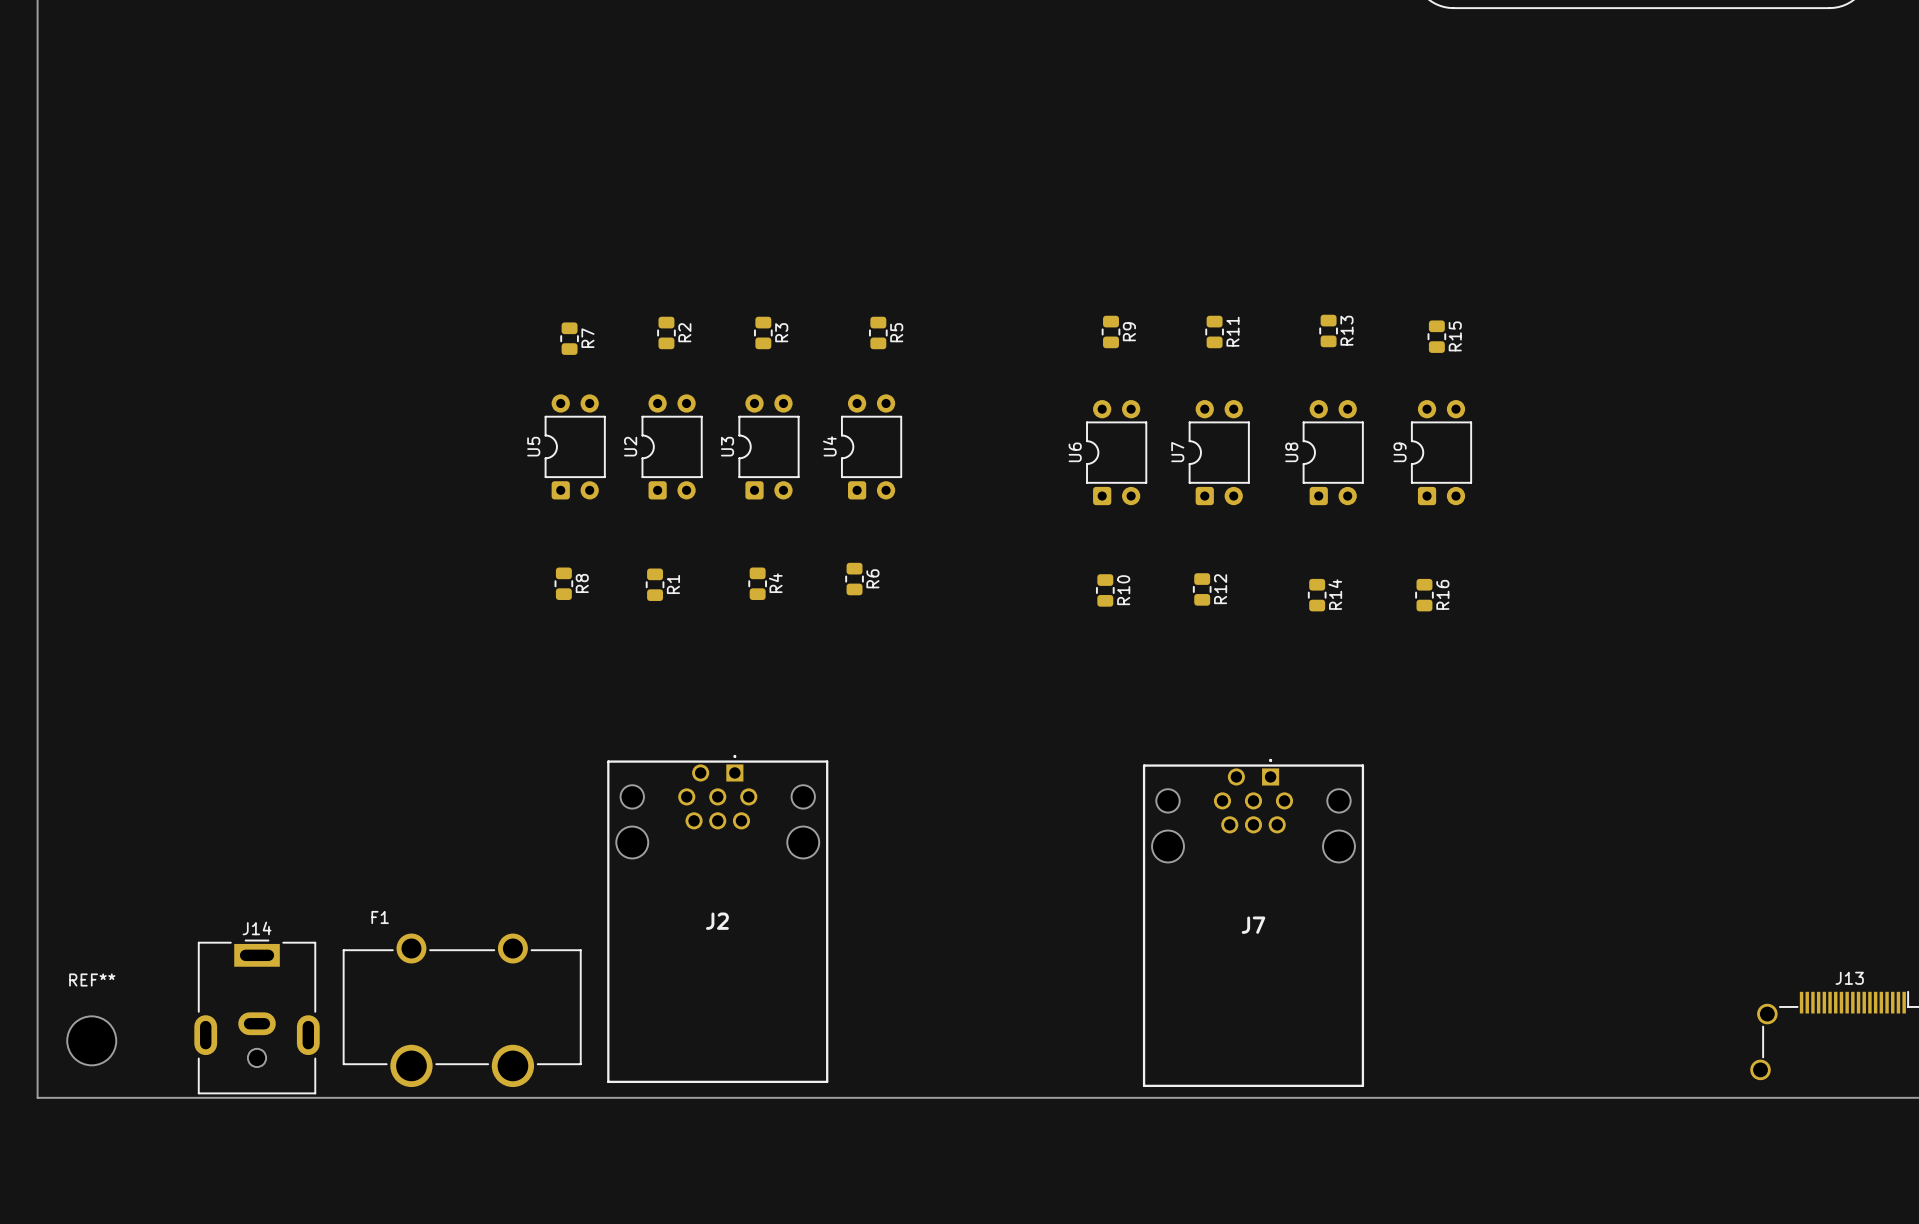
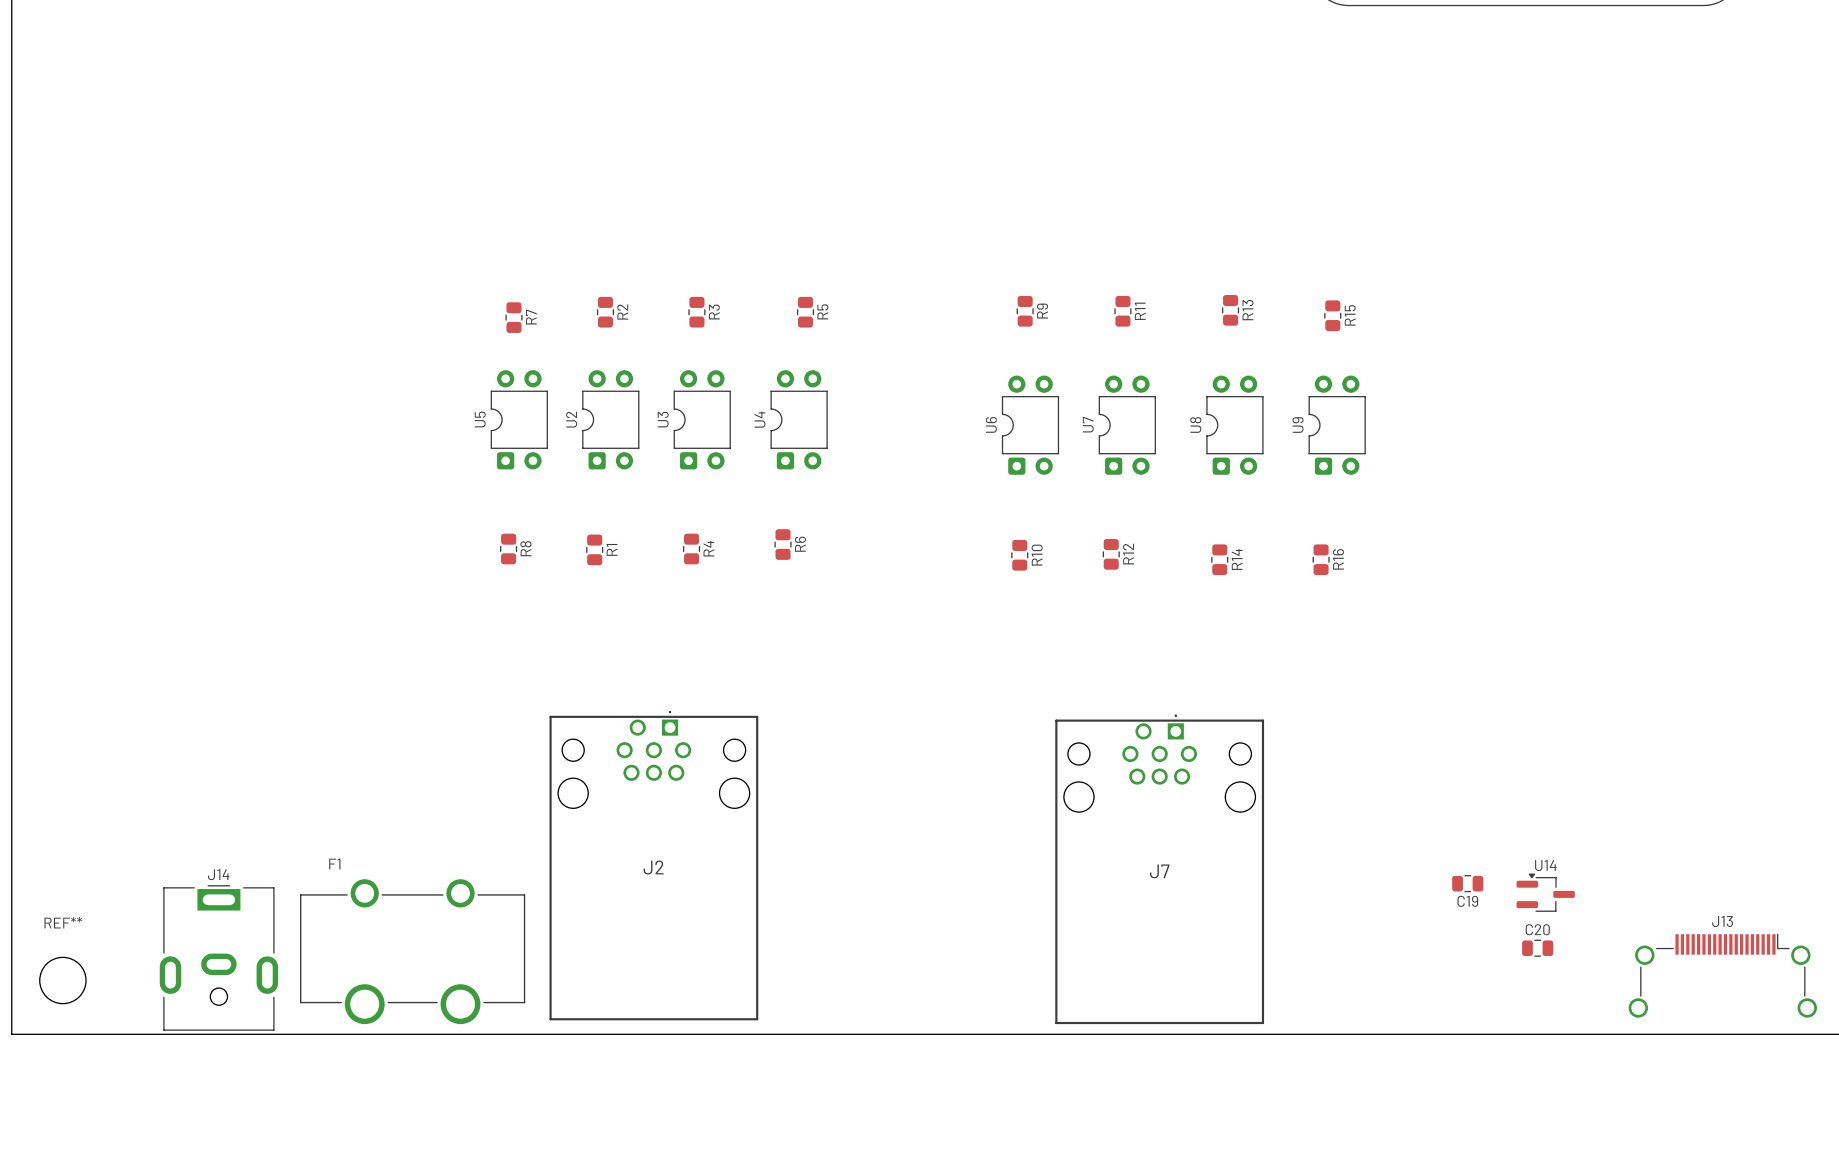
C19: none -> (1467, 883)
U14: none -> (1545, 892)
C20: none -> (1537, 948)

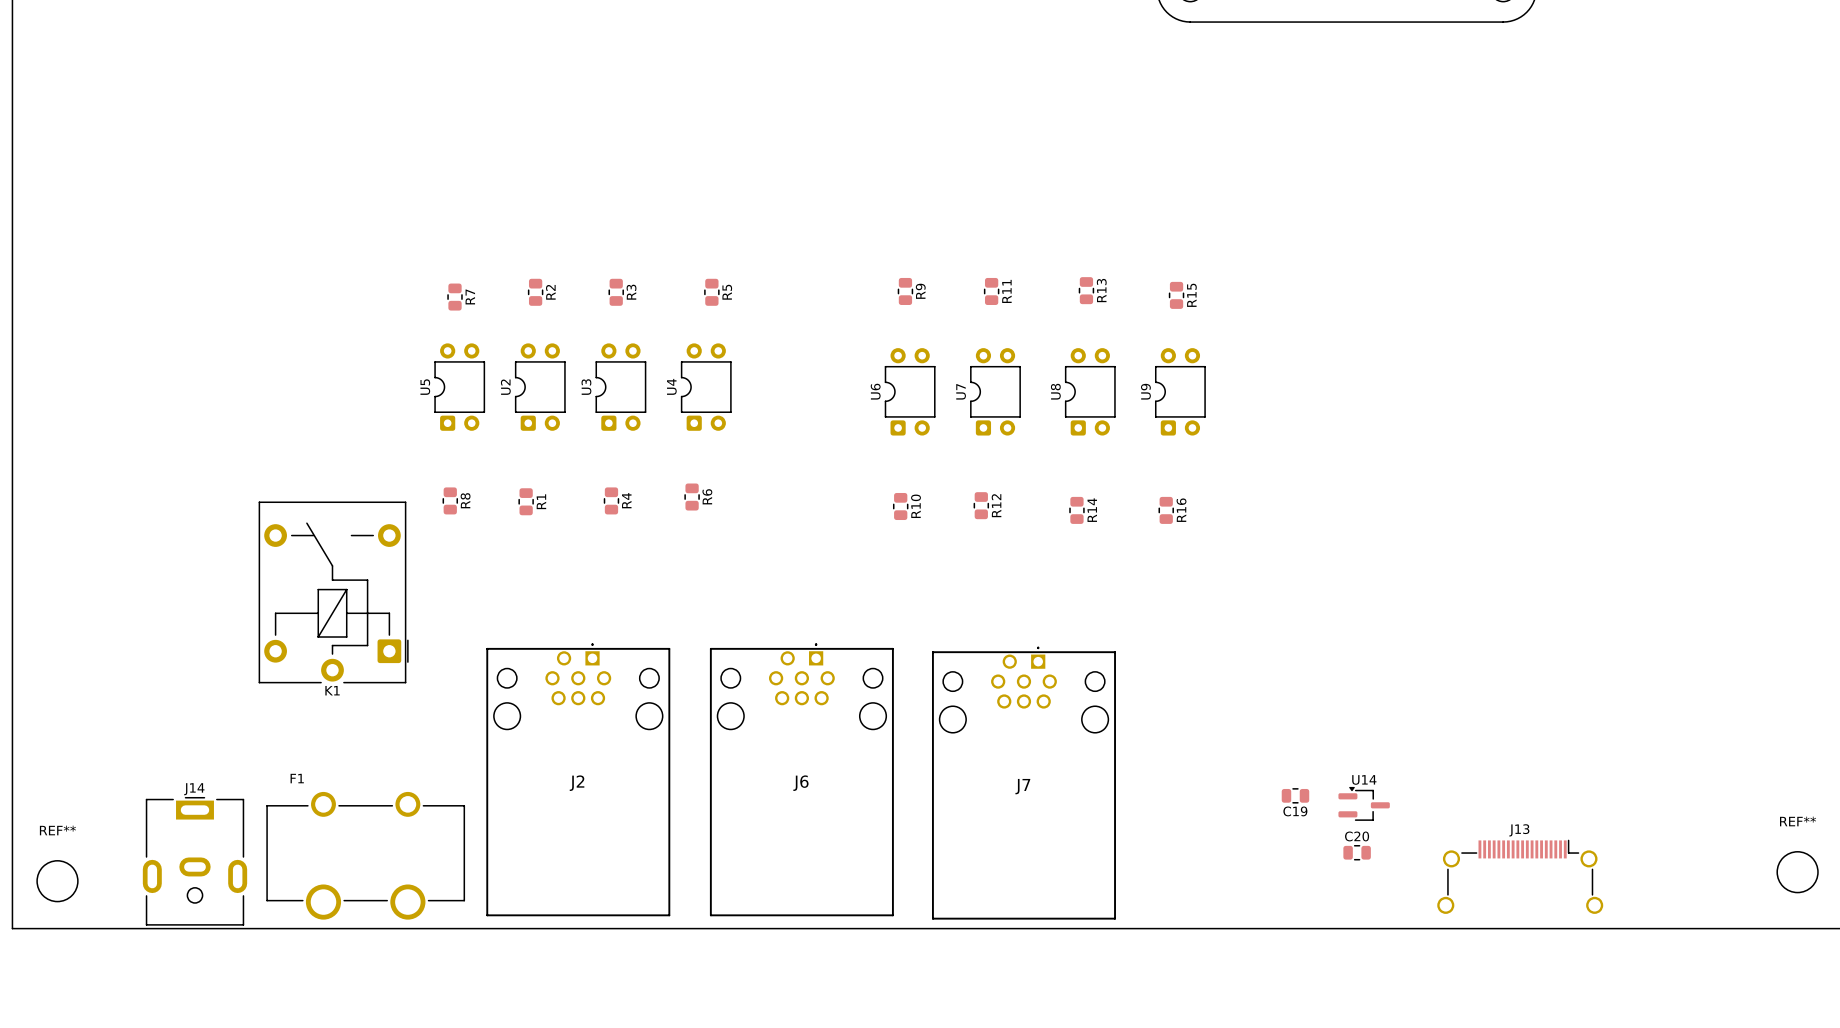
K1: none -> (333, 592)
J6: none -> (801, 779)

